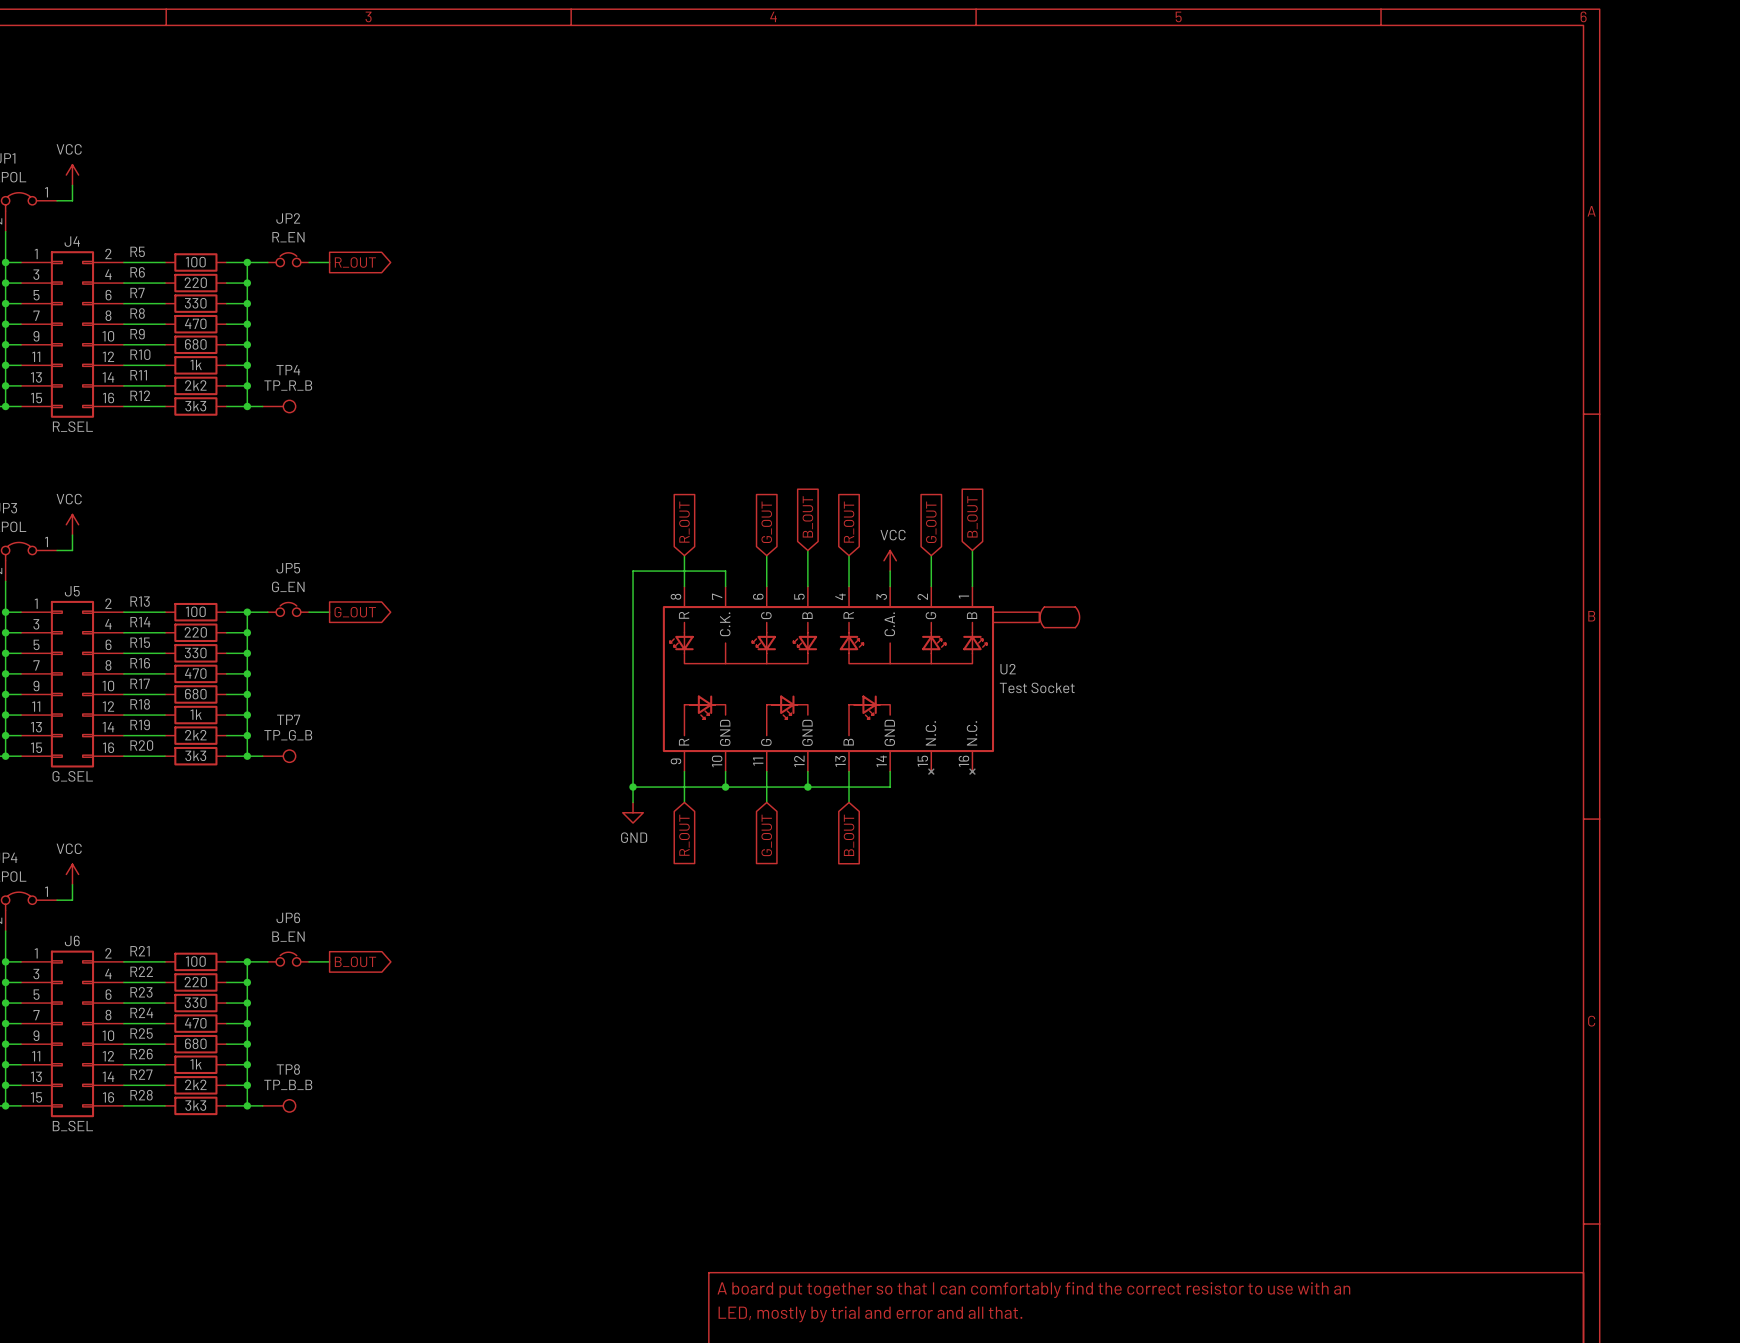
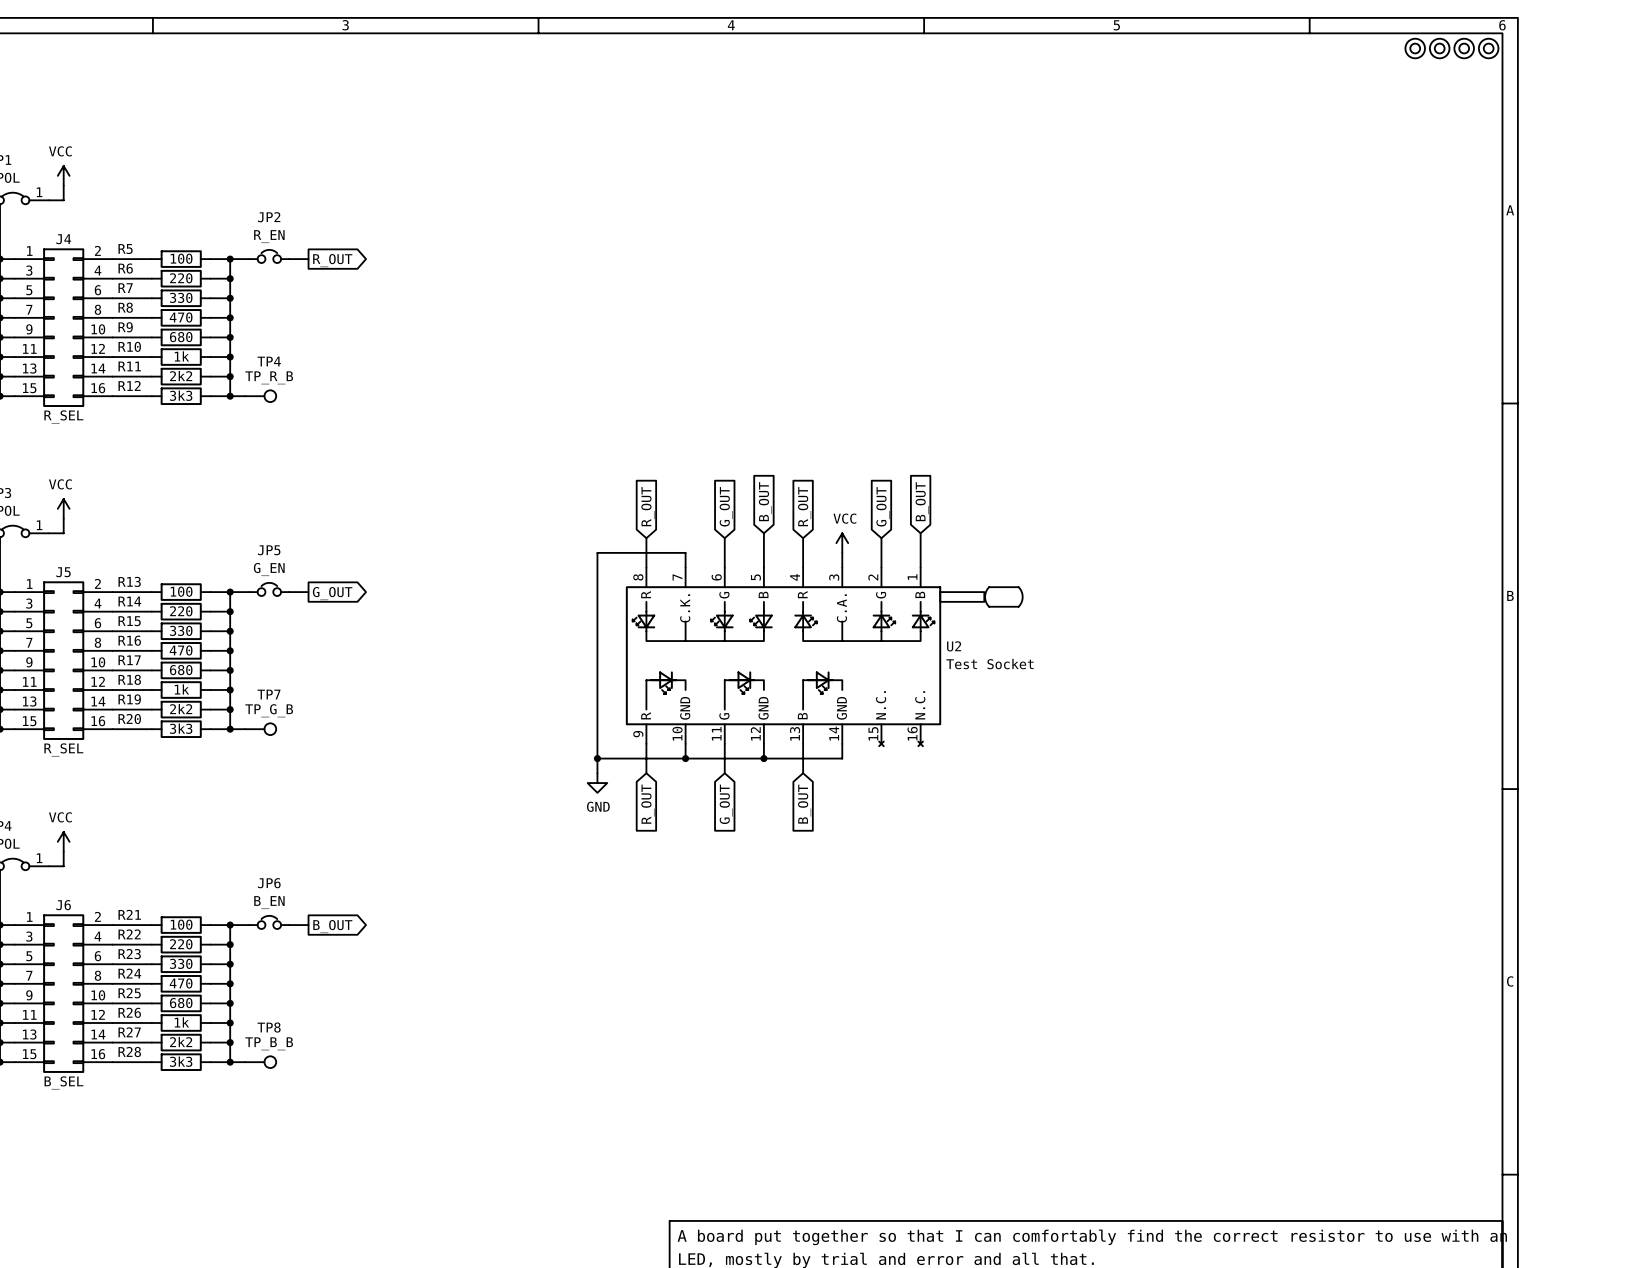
part: none -> (1415, 48)
part: none -> (1439, 48)
part: none -> (1464, 48)
part: none -> (1488, 48)
J5 value: G_SEL (72, 776) -> R_SEL (63, 749)

